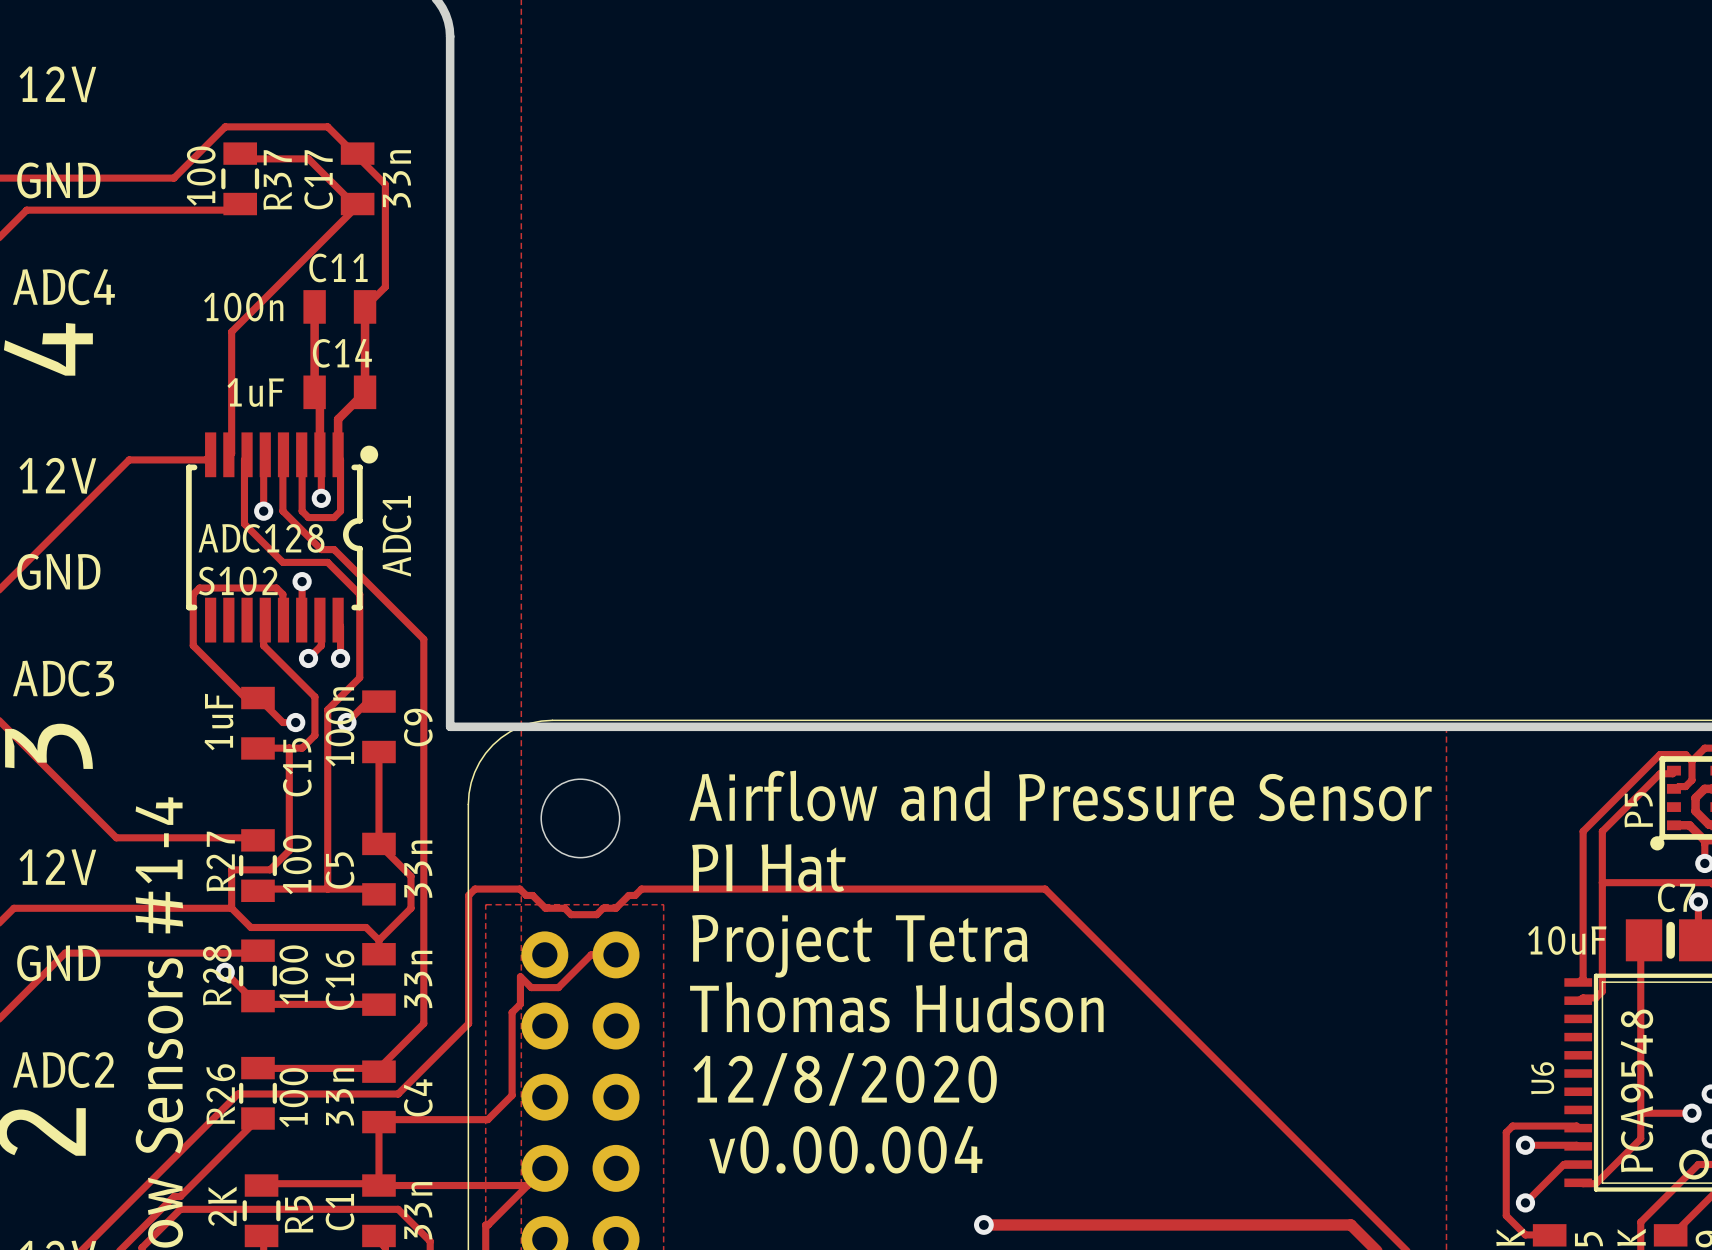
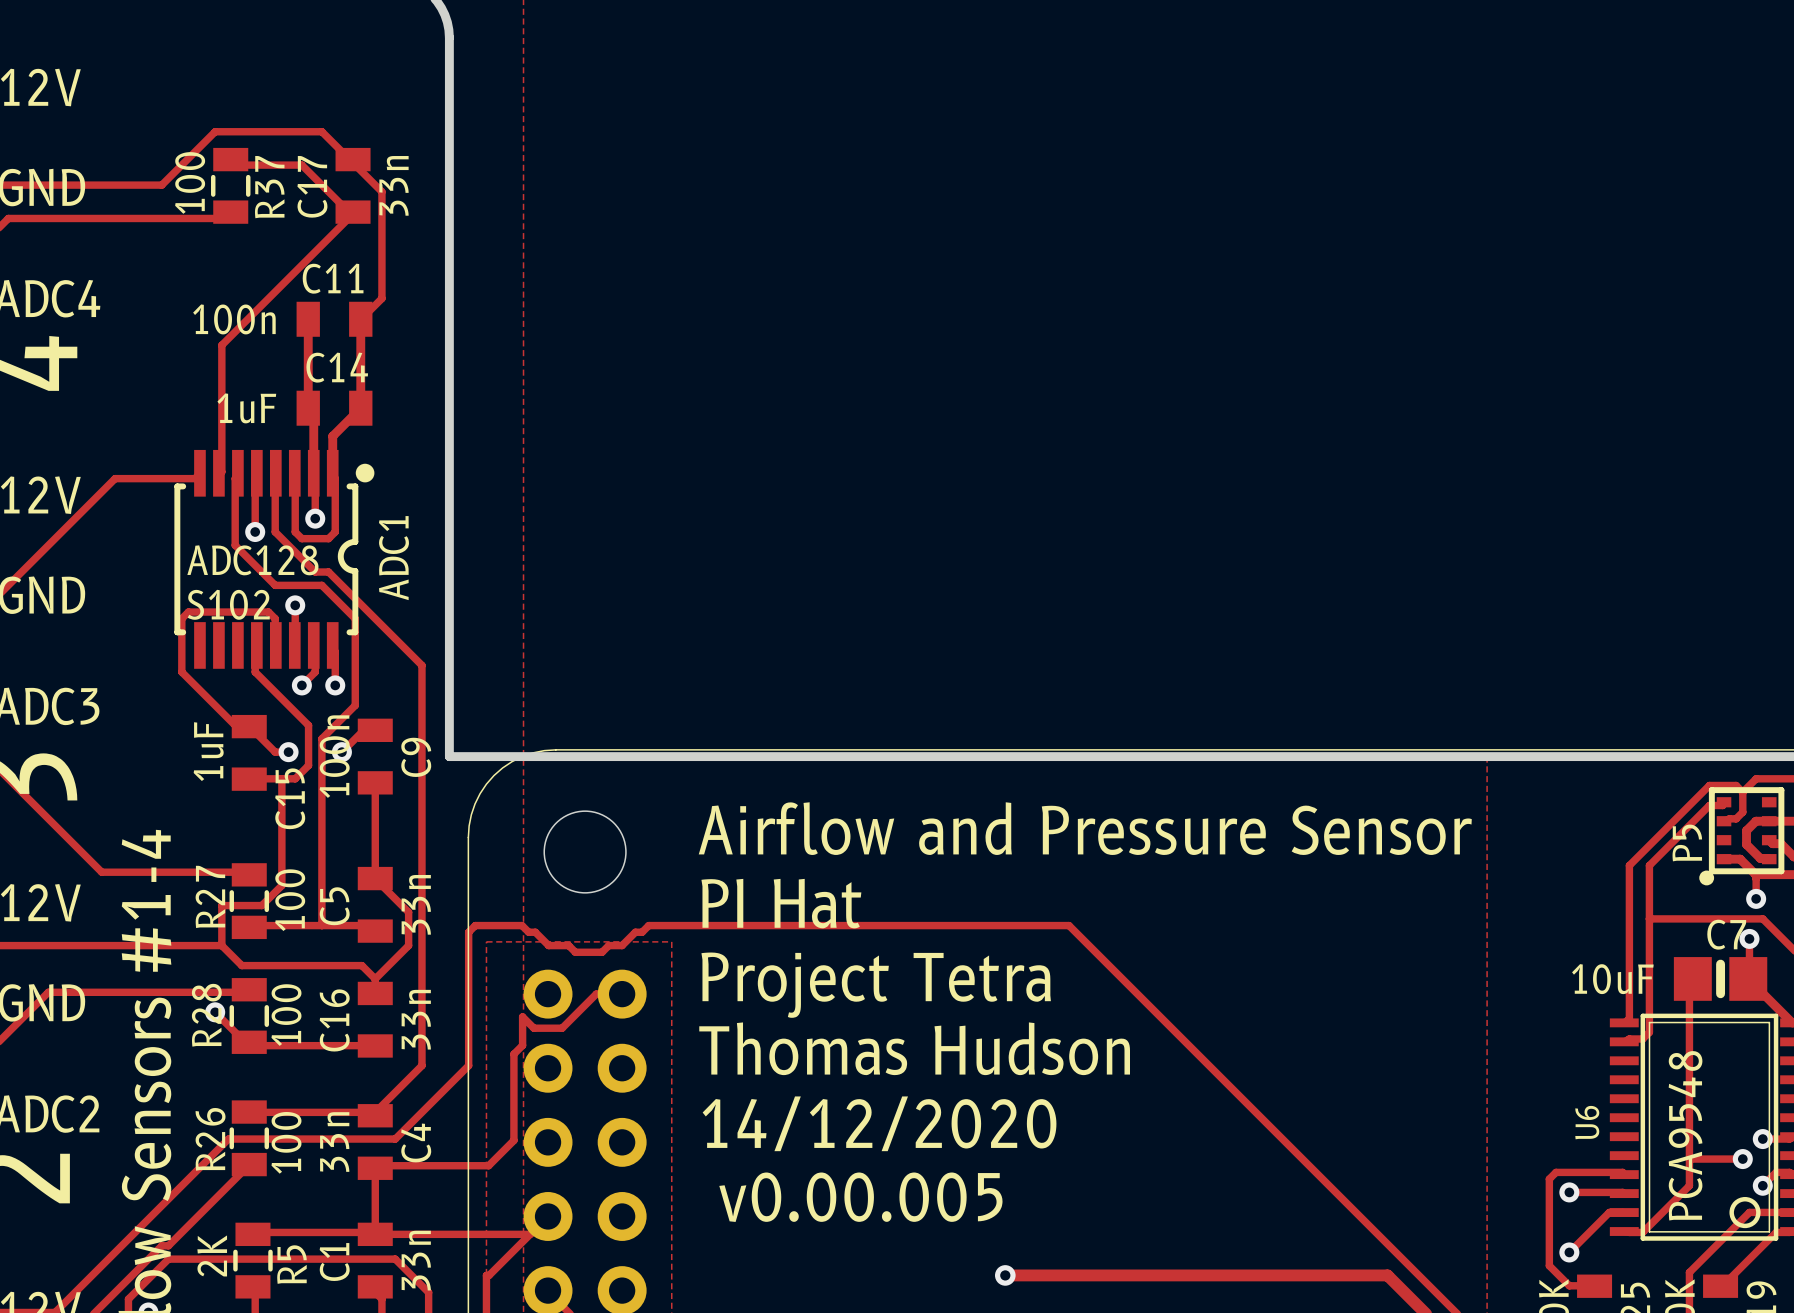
text: 12/8/2020 (845, 1079) -> 14/12/2020 (879, 1123)
text: v0.00.004 (845, 1149) -> v0.00.005 (860, 1197)

